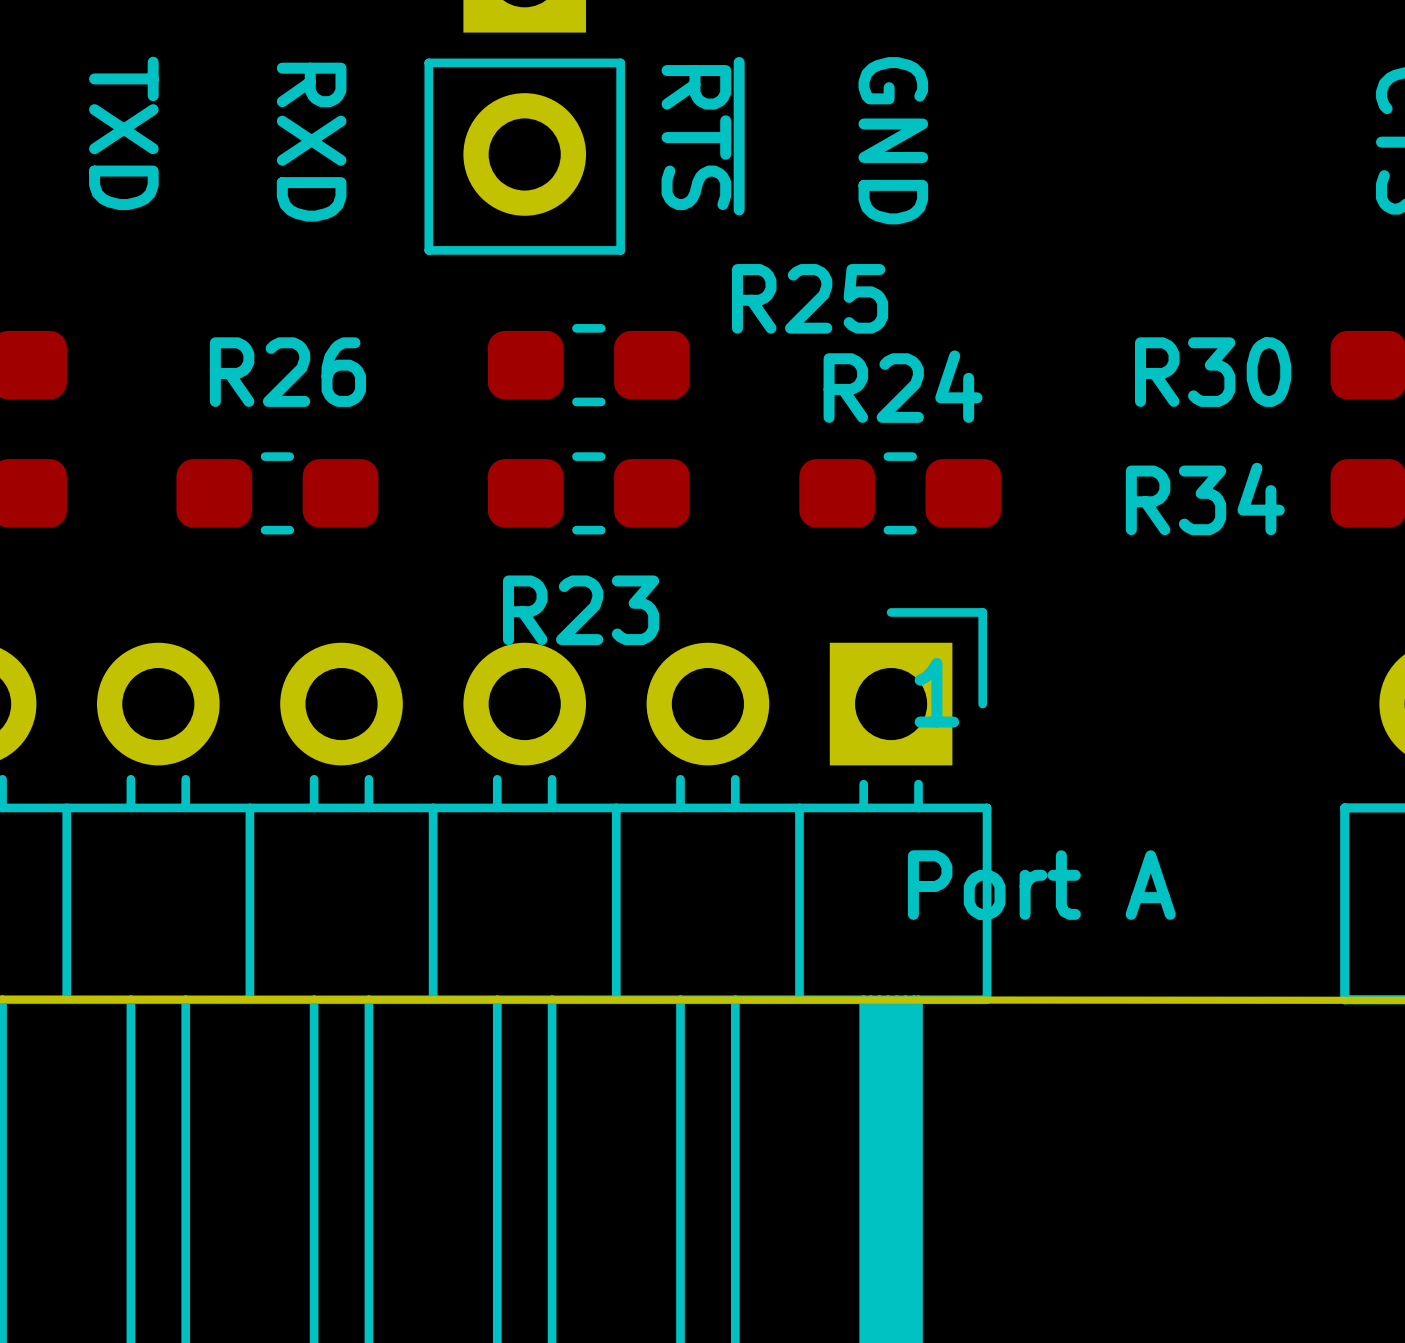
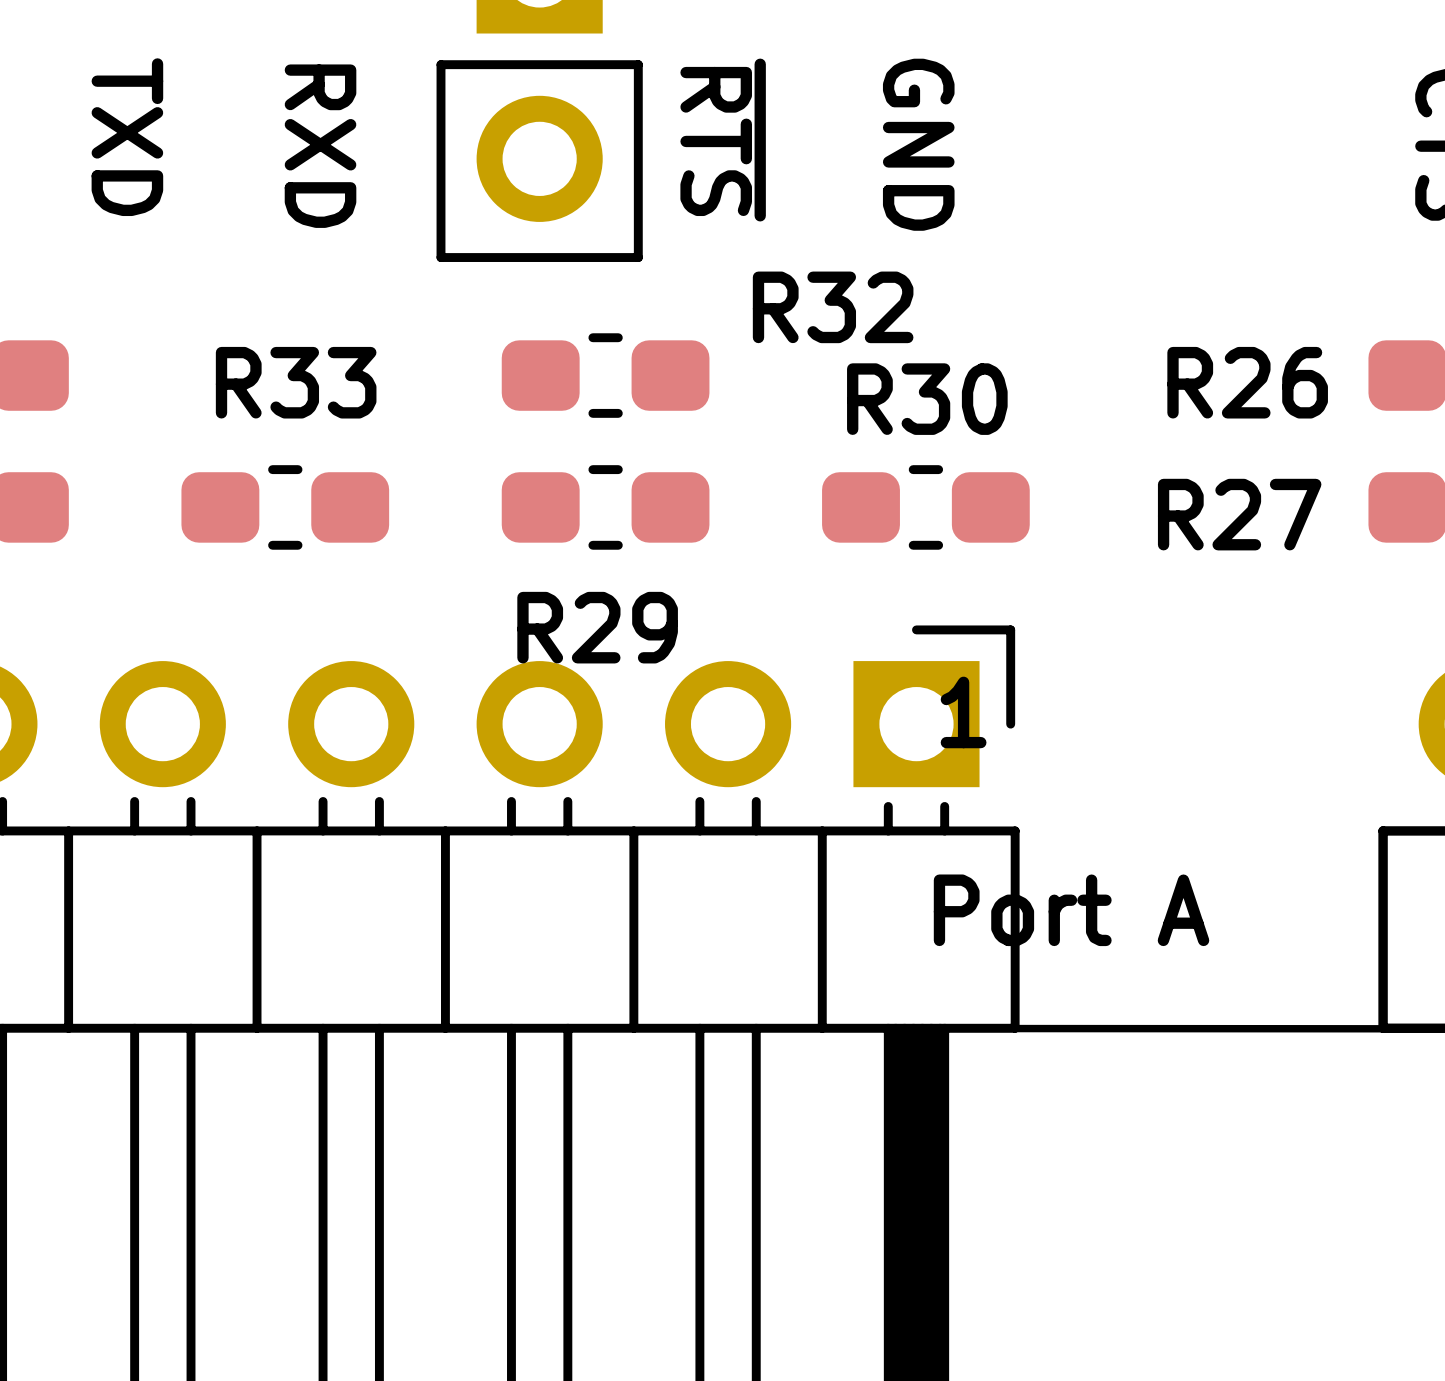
R25 name: R25 (810, 298) -> R32 (833, 307)
R26 name: R26 (287, 372) -> R33 (296, 382)
R30 name: R30 (1213, 372) -> R26 (1247, 382)
R24 name: R24 (903, 386) -> R30 (927, 399)
R34 name: R34 (1205, 498) -> R27 (1239, 514)
R23 name: R23 (581, 610) -> R29 (597, 627)

